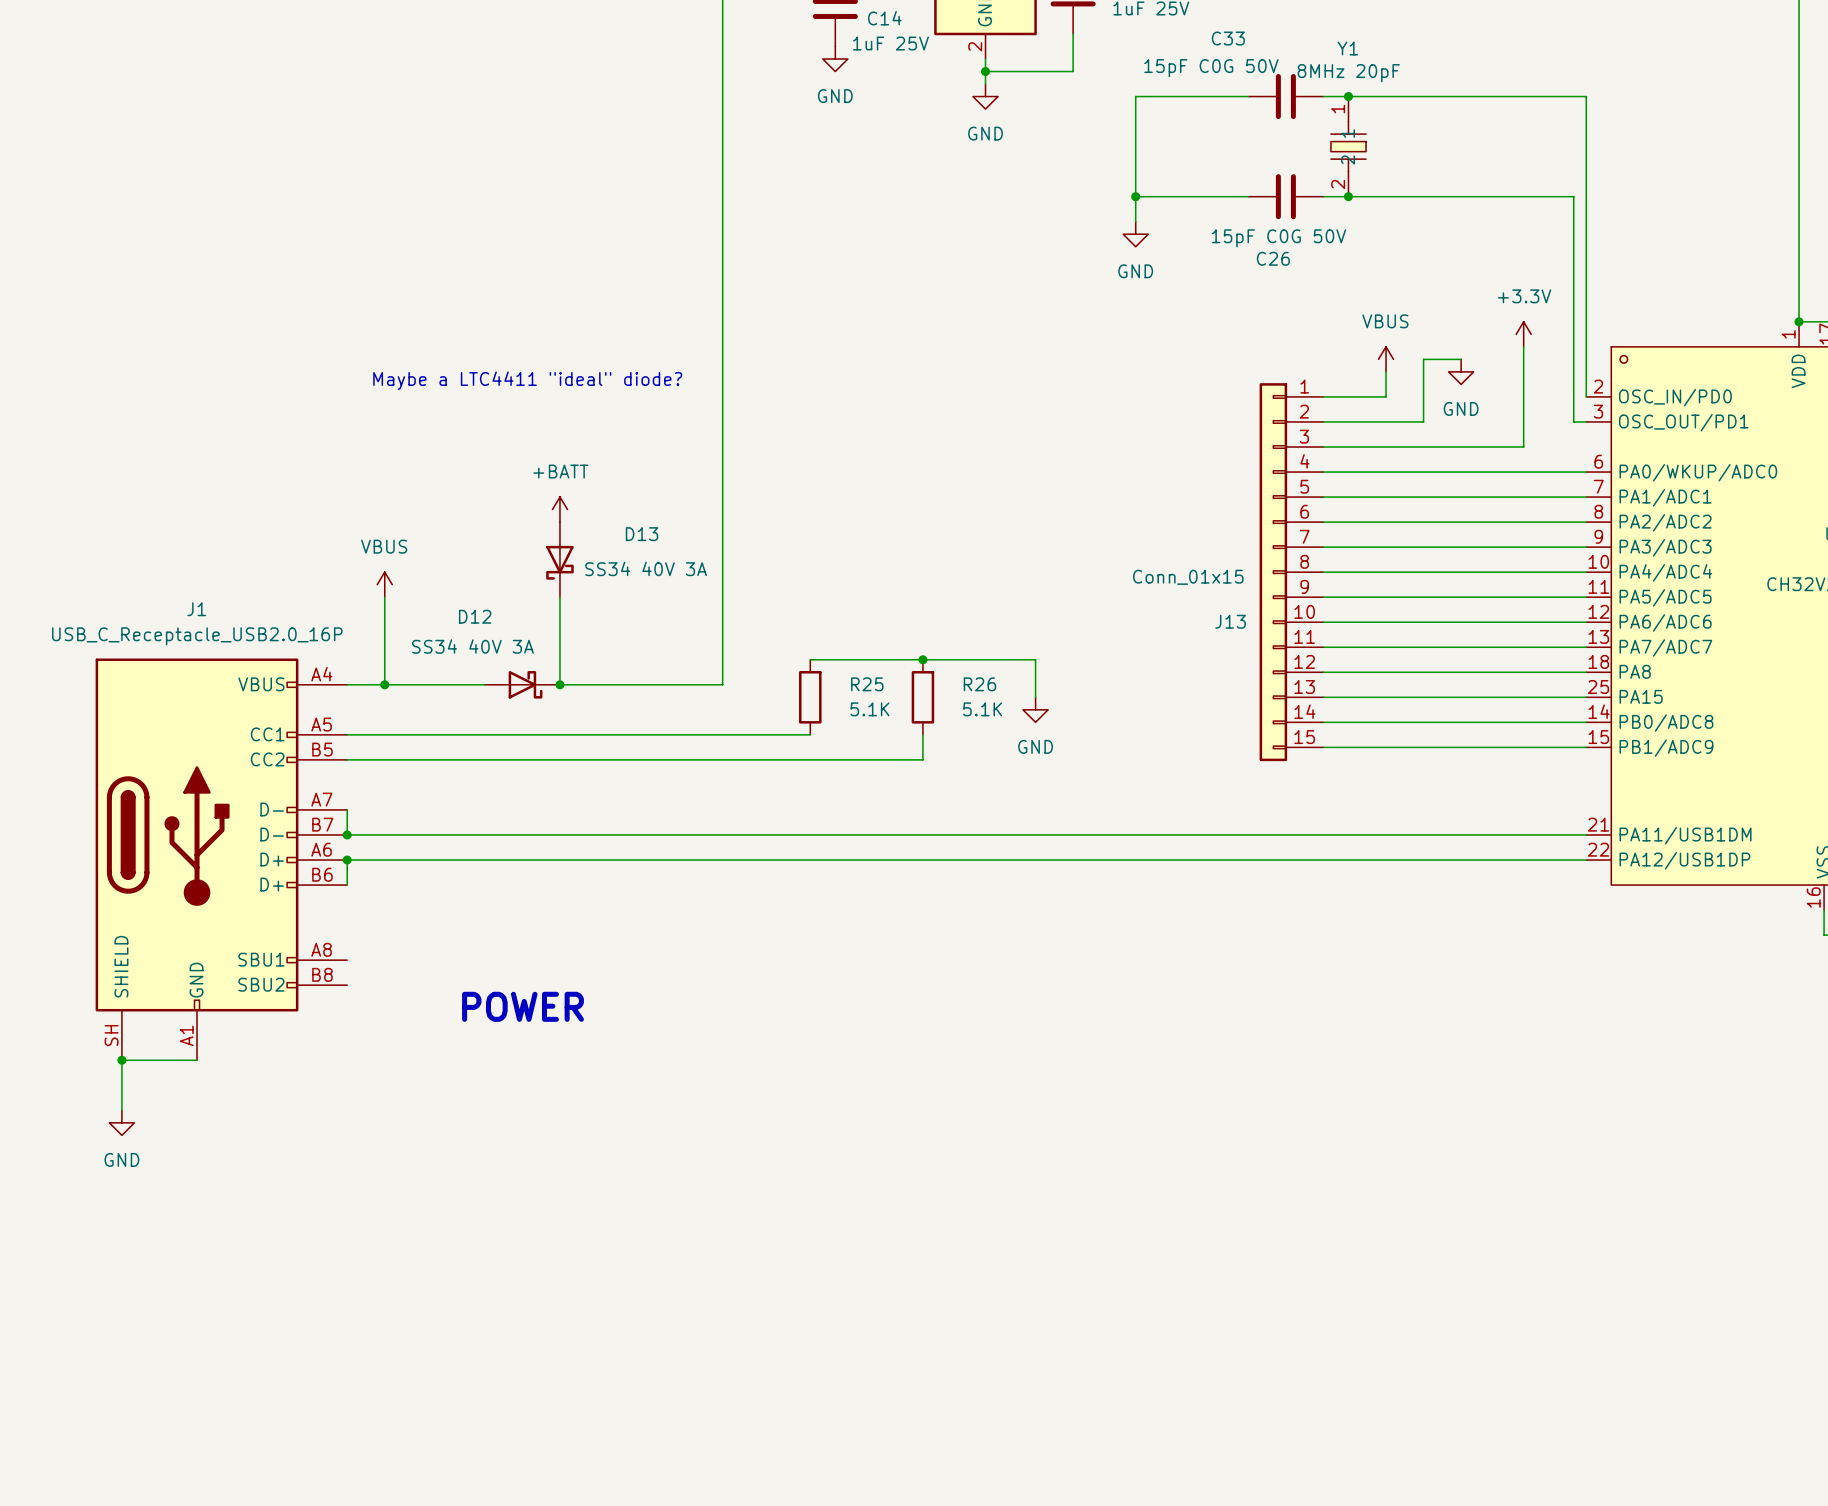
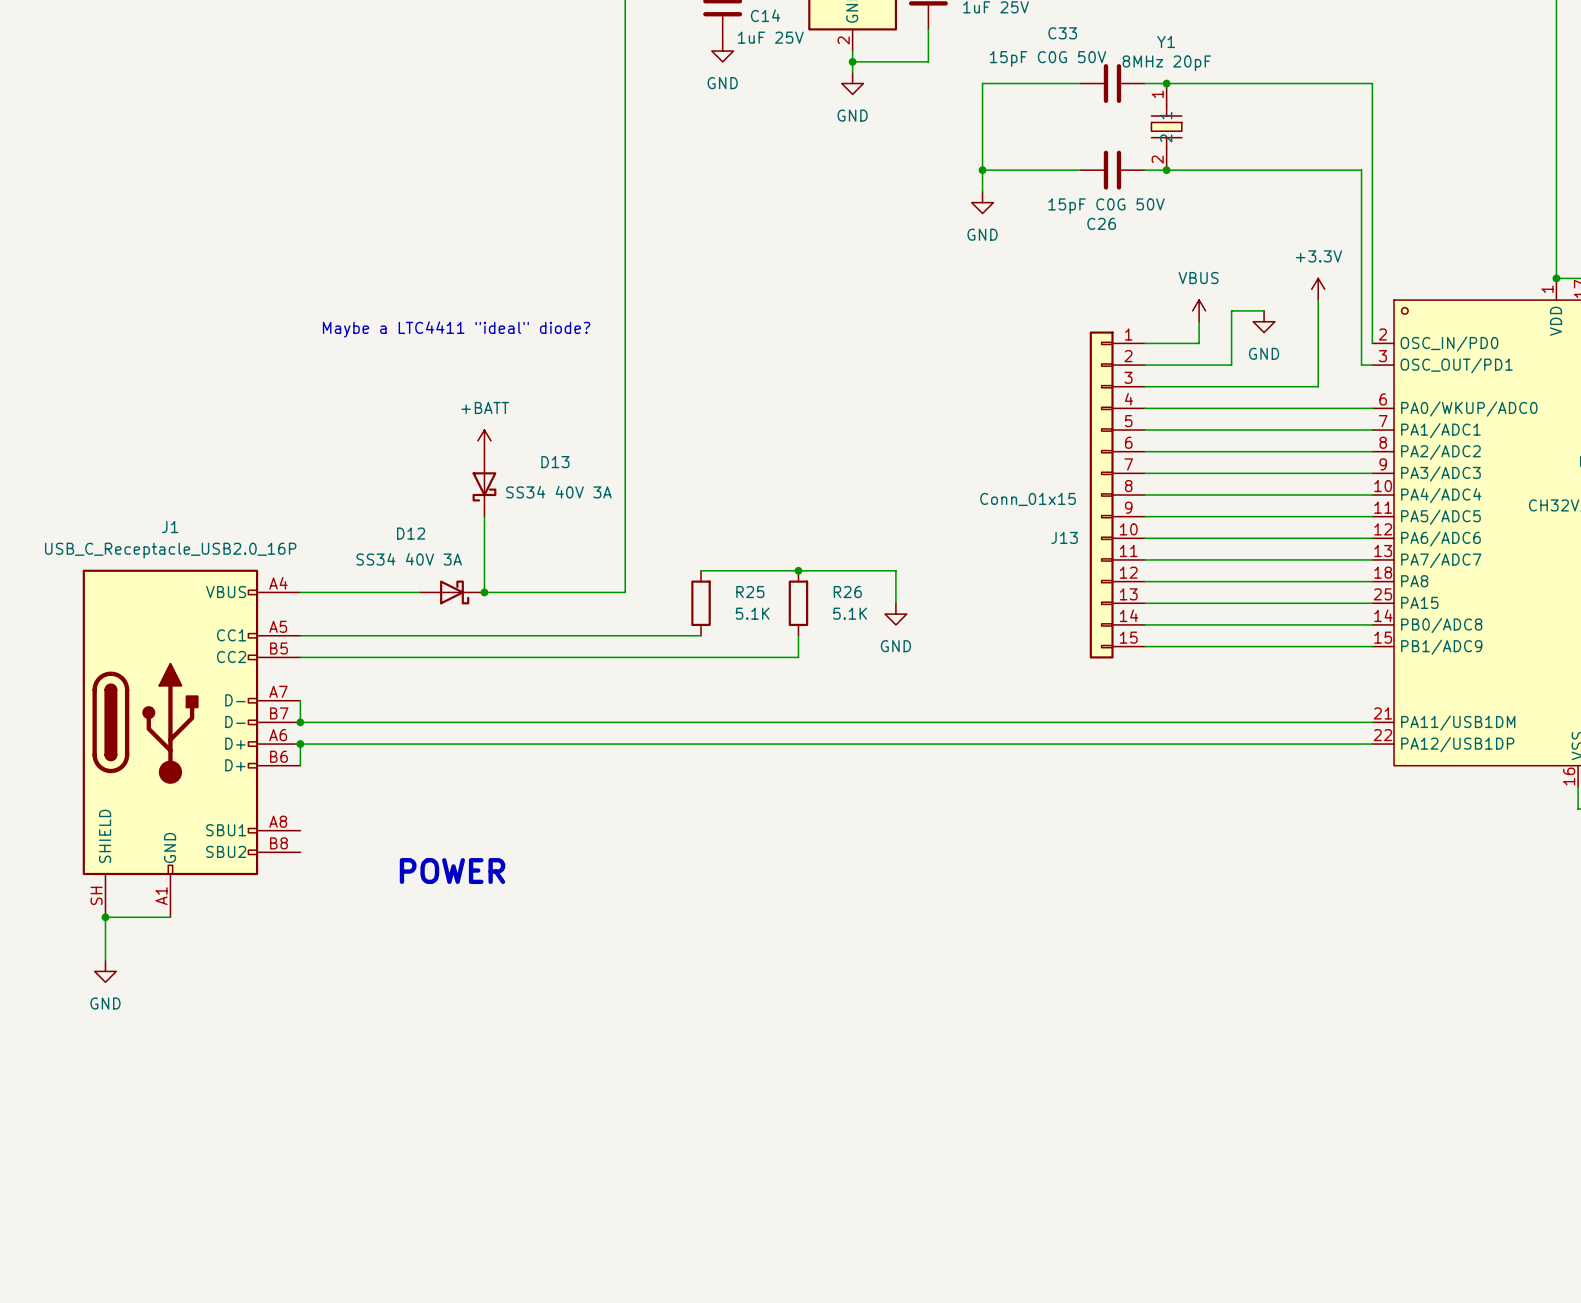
power symbol: VBUS (384, 584) -> none
wire: (384, 597) (384, 684) -> none
junction: (384, 684) -> none

